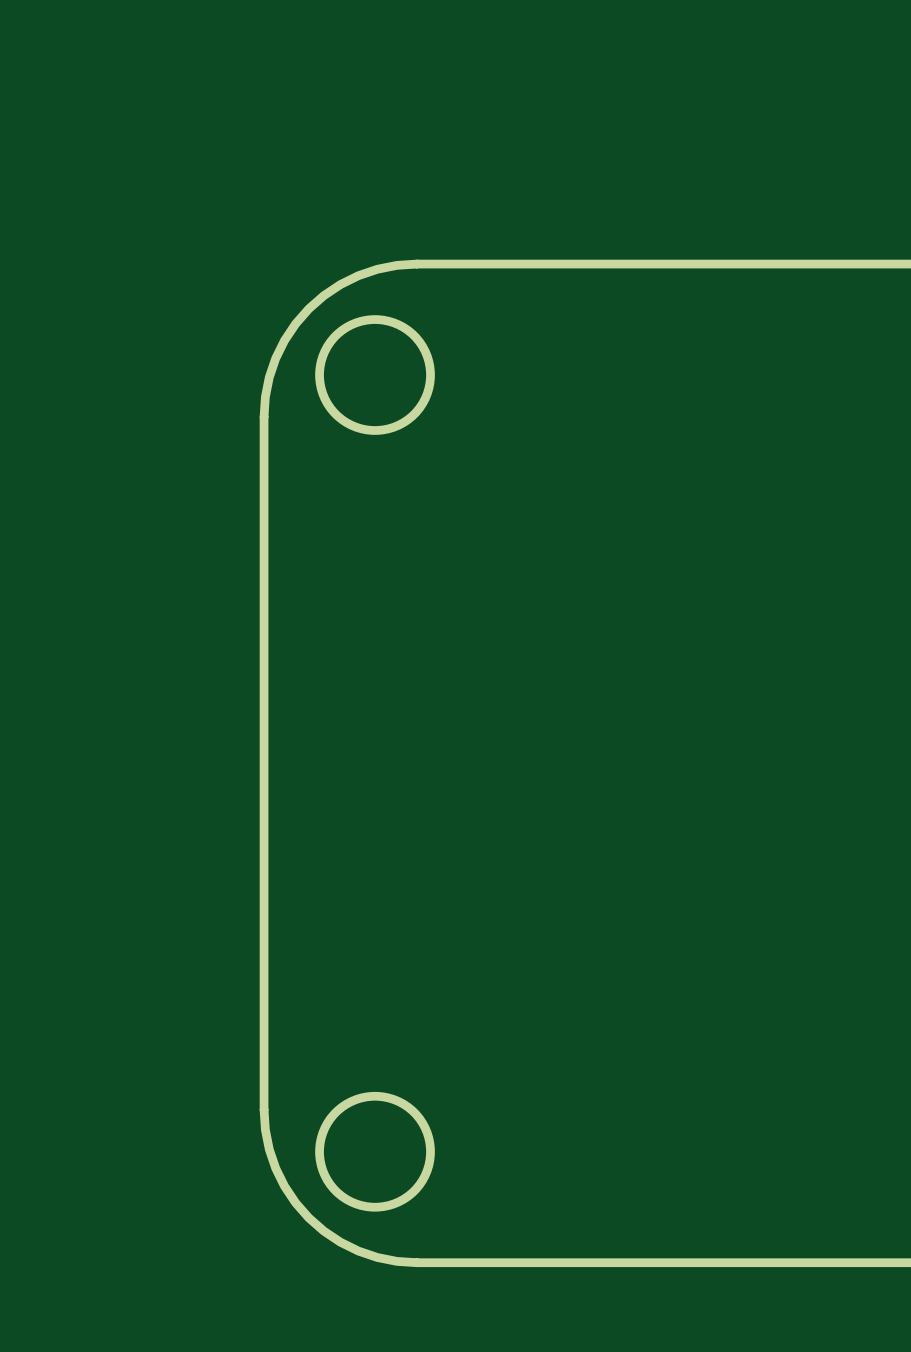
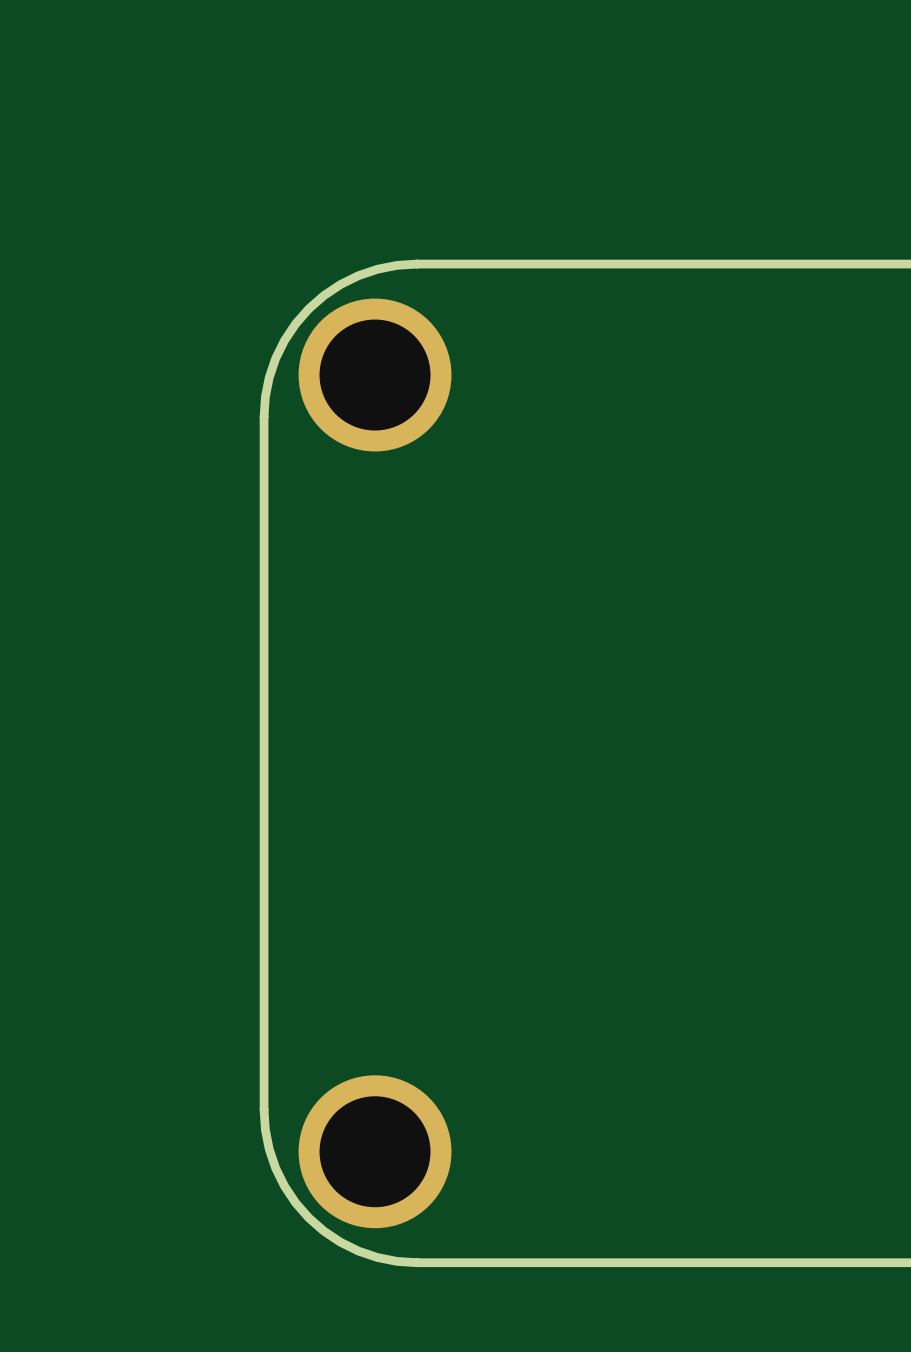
round board edge: [315, 315, 435, 435] -> none
part: none -> (375, 375)
round board edge: [315, 1091, 435, 1212] -> none
part: none -> (375, 1151)

